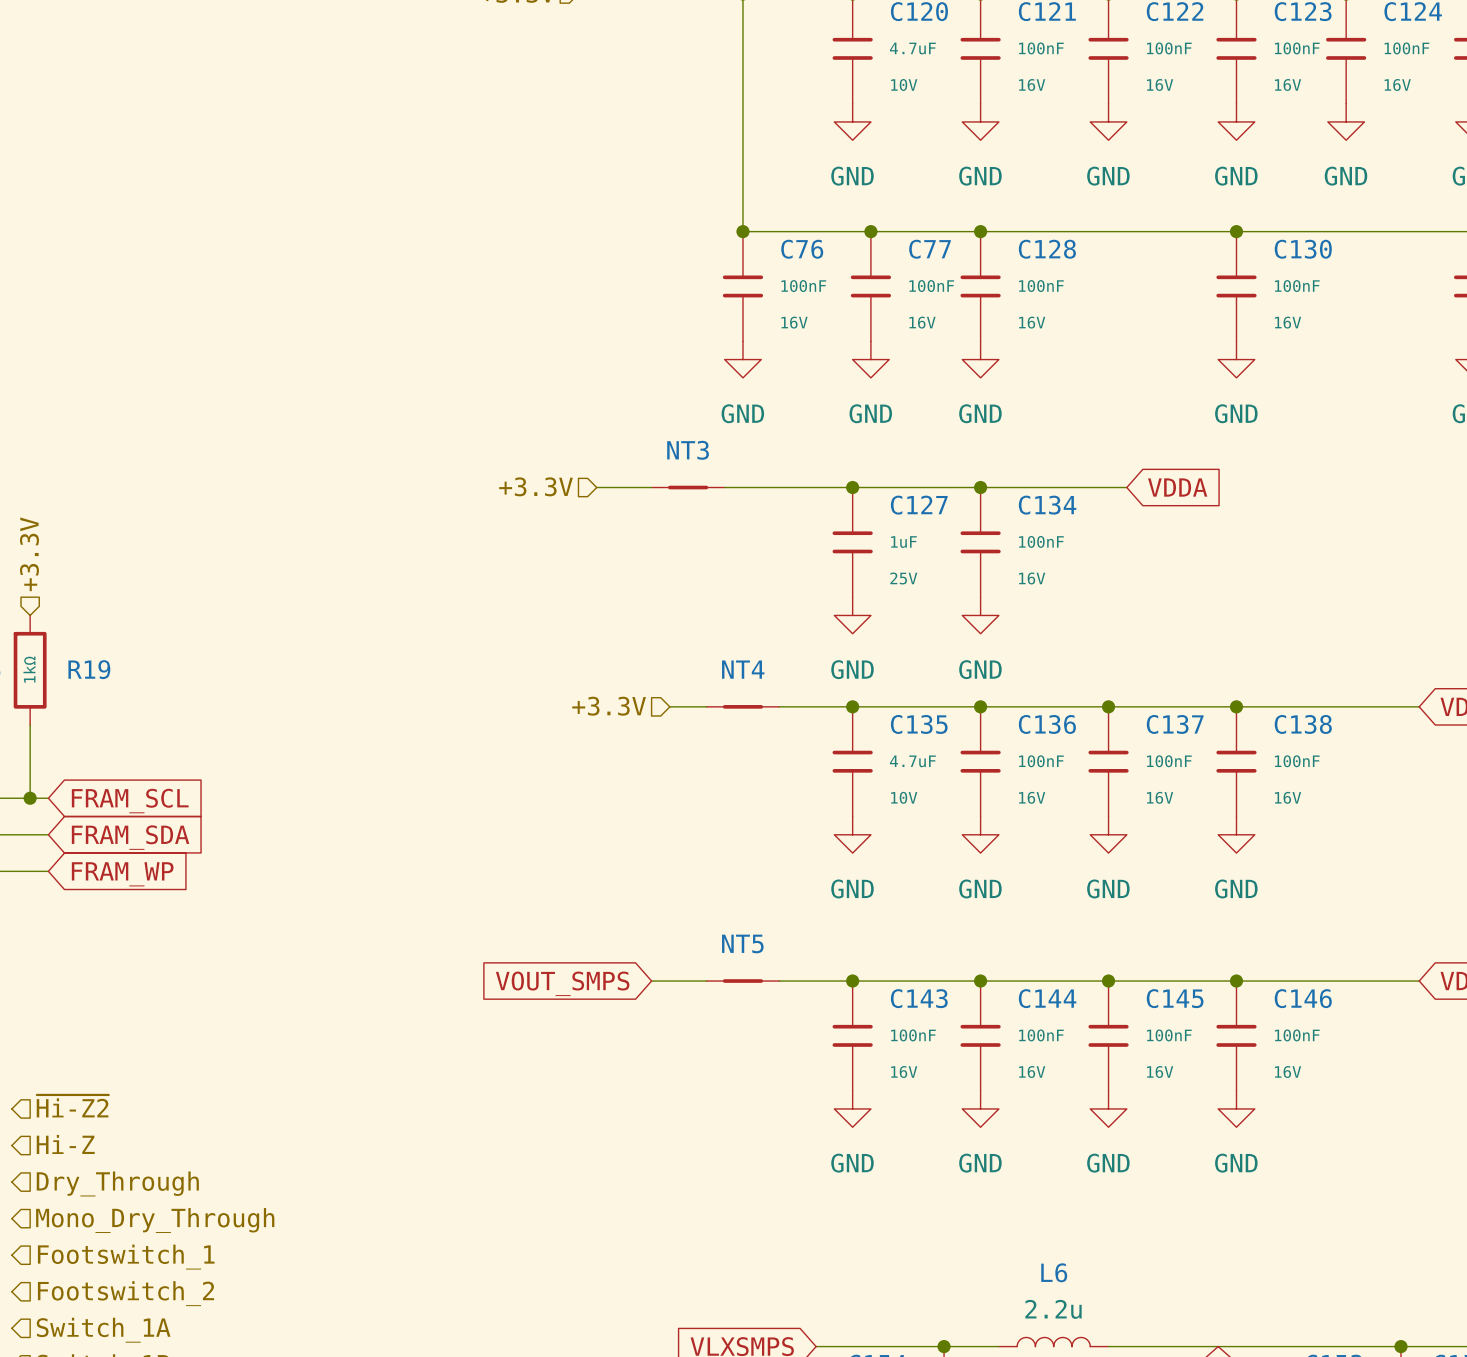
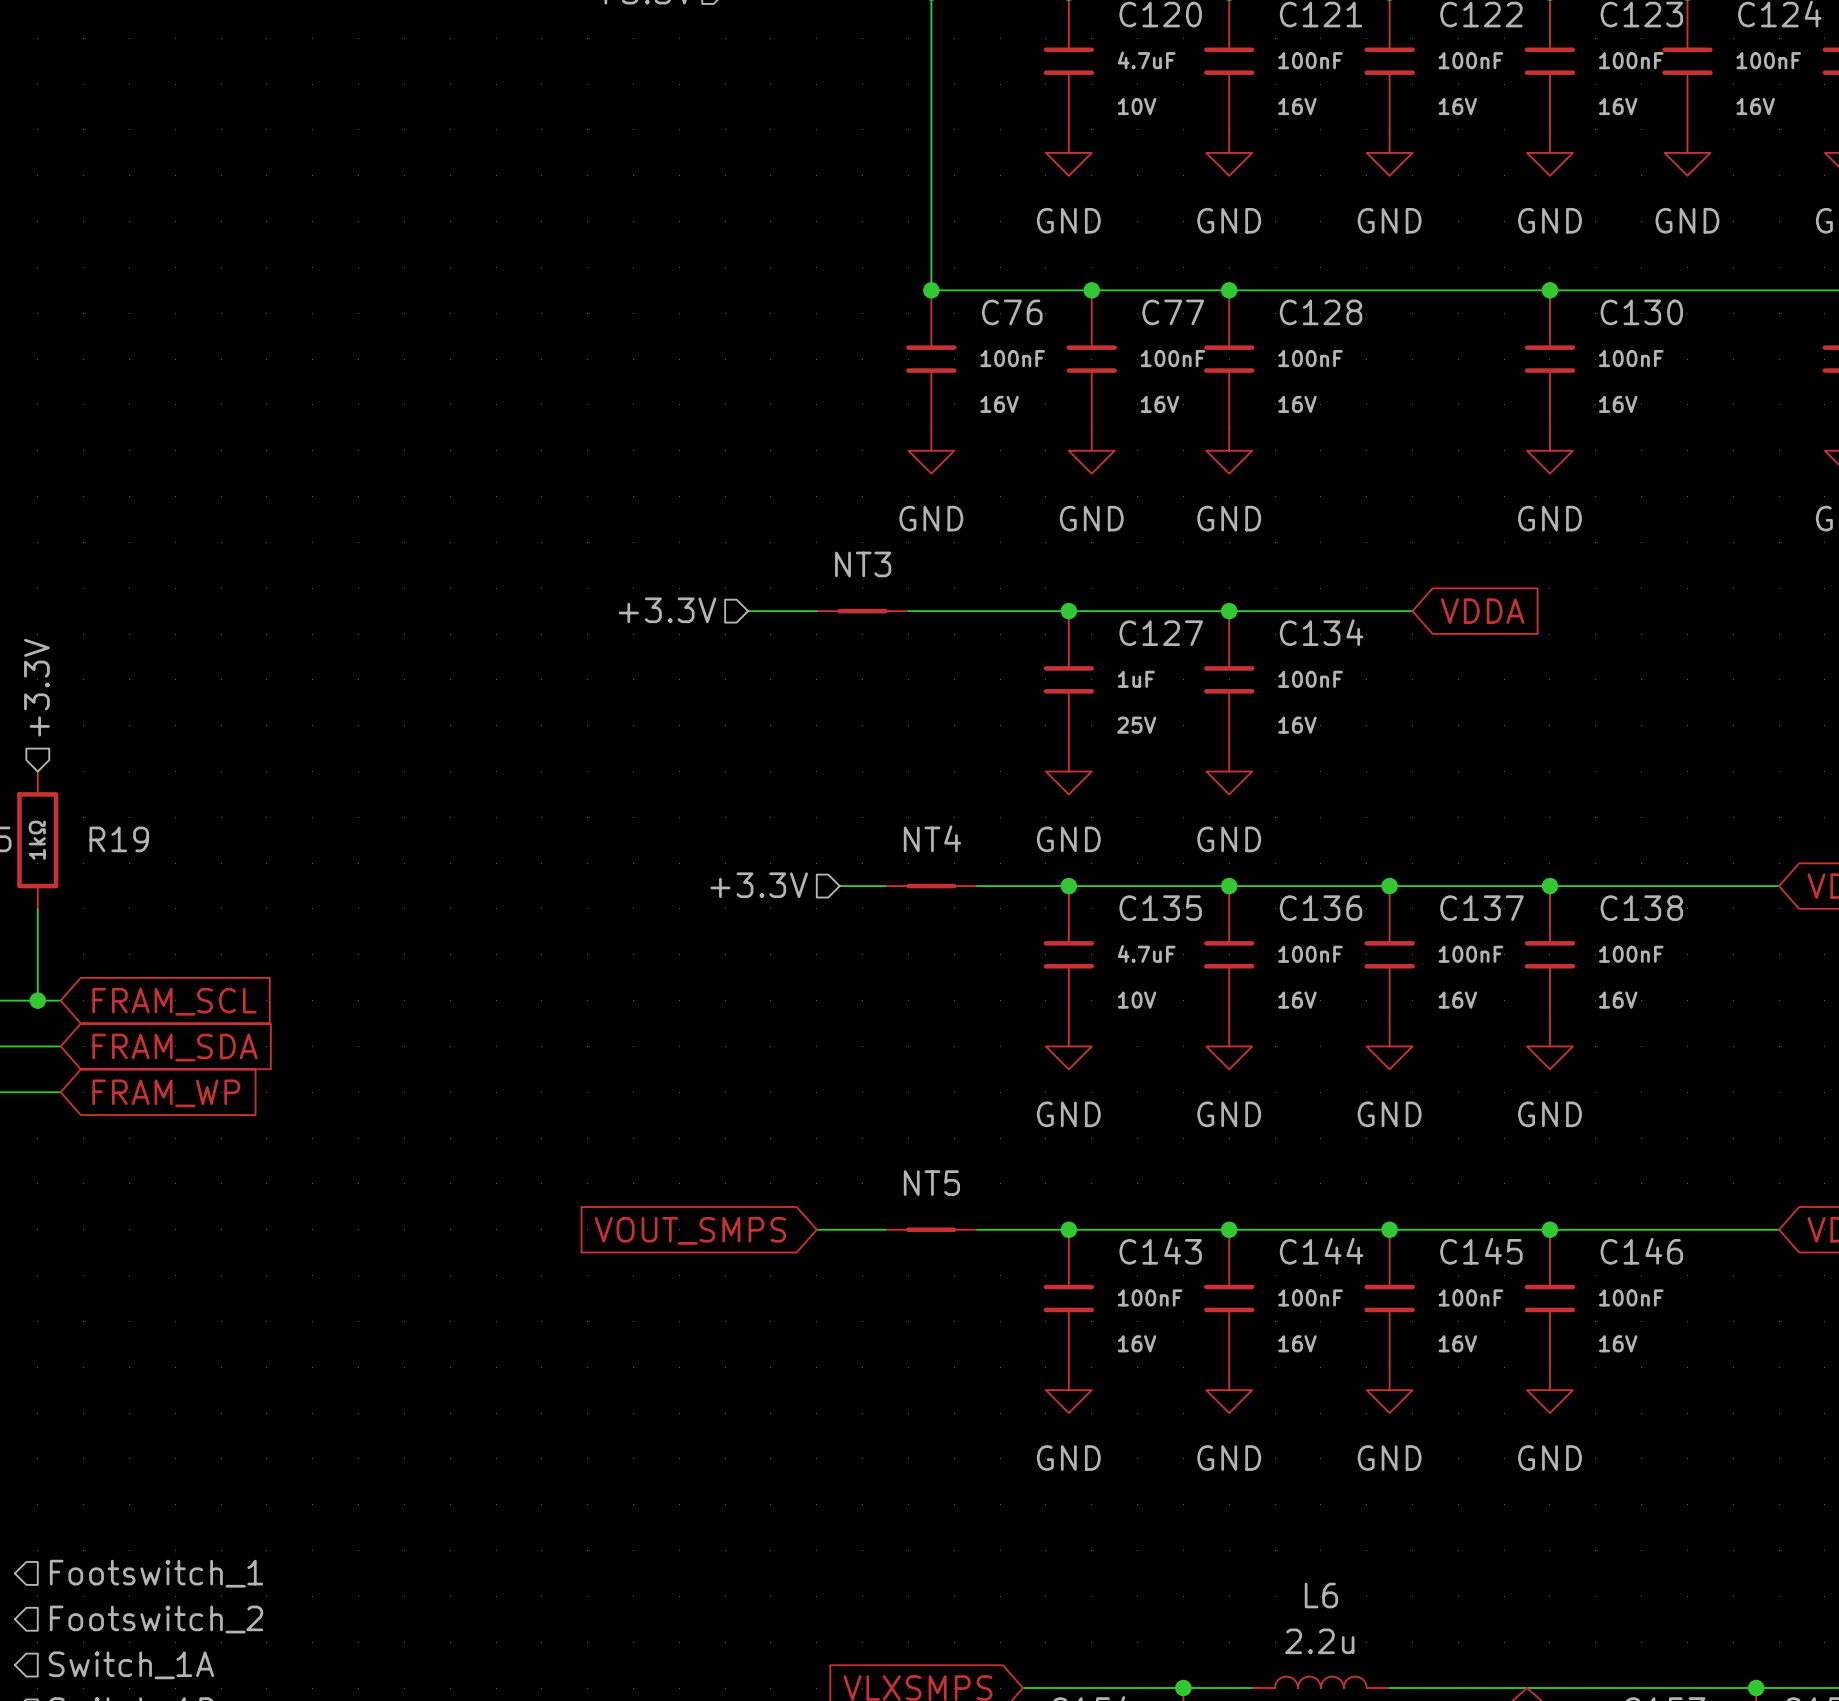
hierarchical label: ~{Hi-Z2} (72, 1106) -> none
hierarchical label: Hi-Z (65, 1144) -> none
hierarchical label: Dry_Through (117, 1183) -> none
hierarchical label: Mono_Dry_Through (155, 1220) -> none

